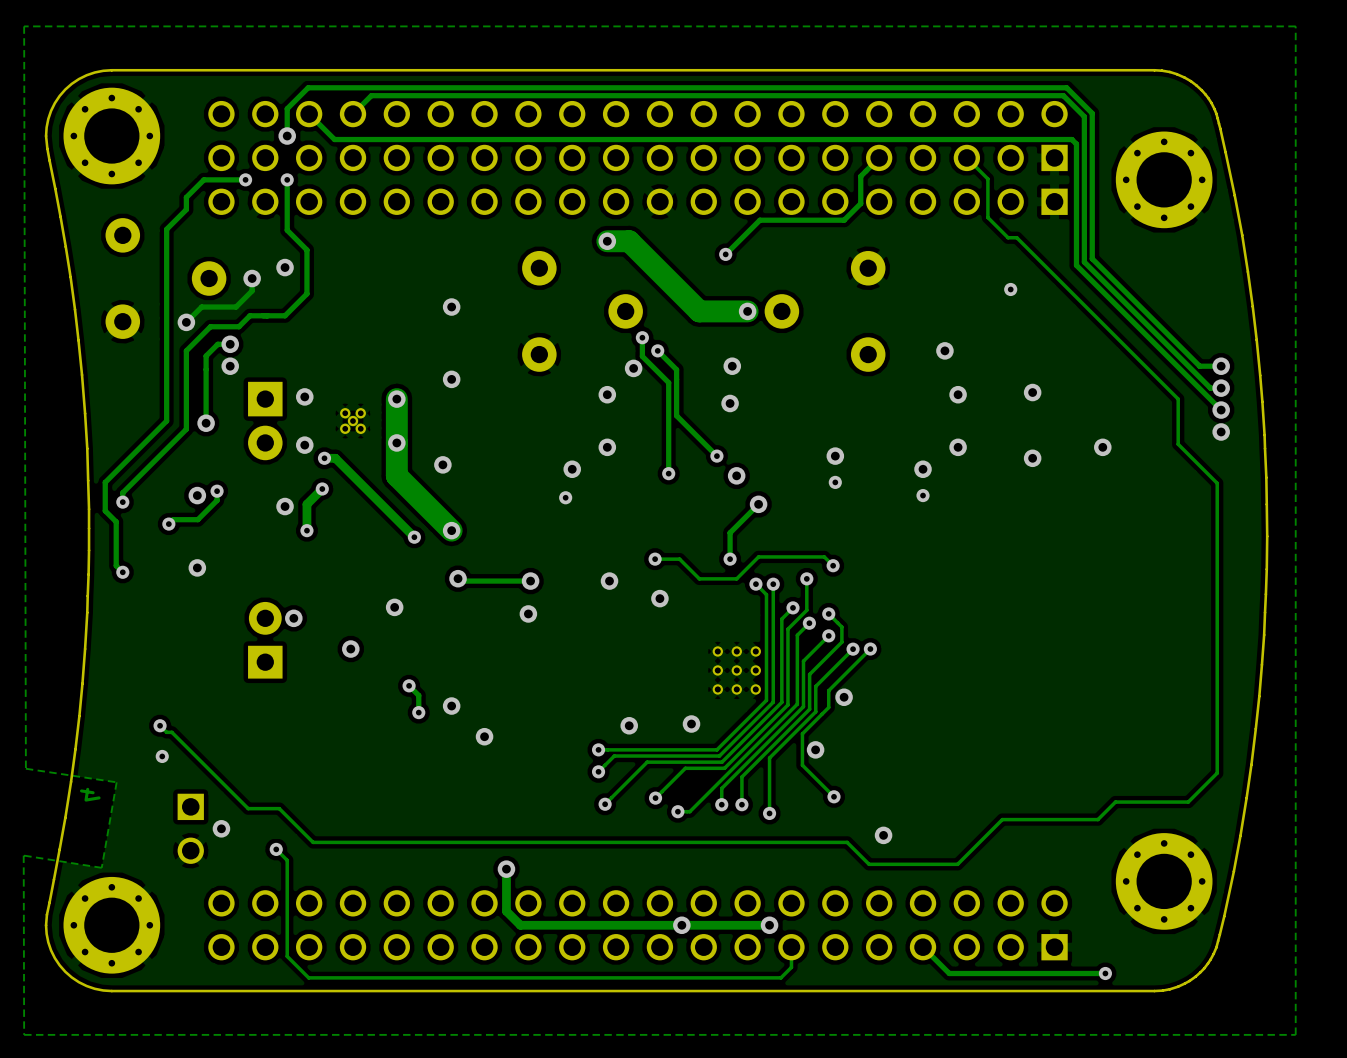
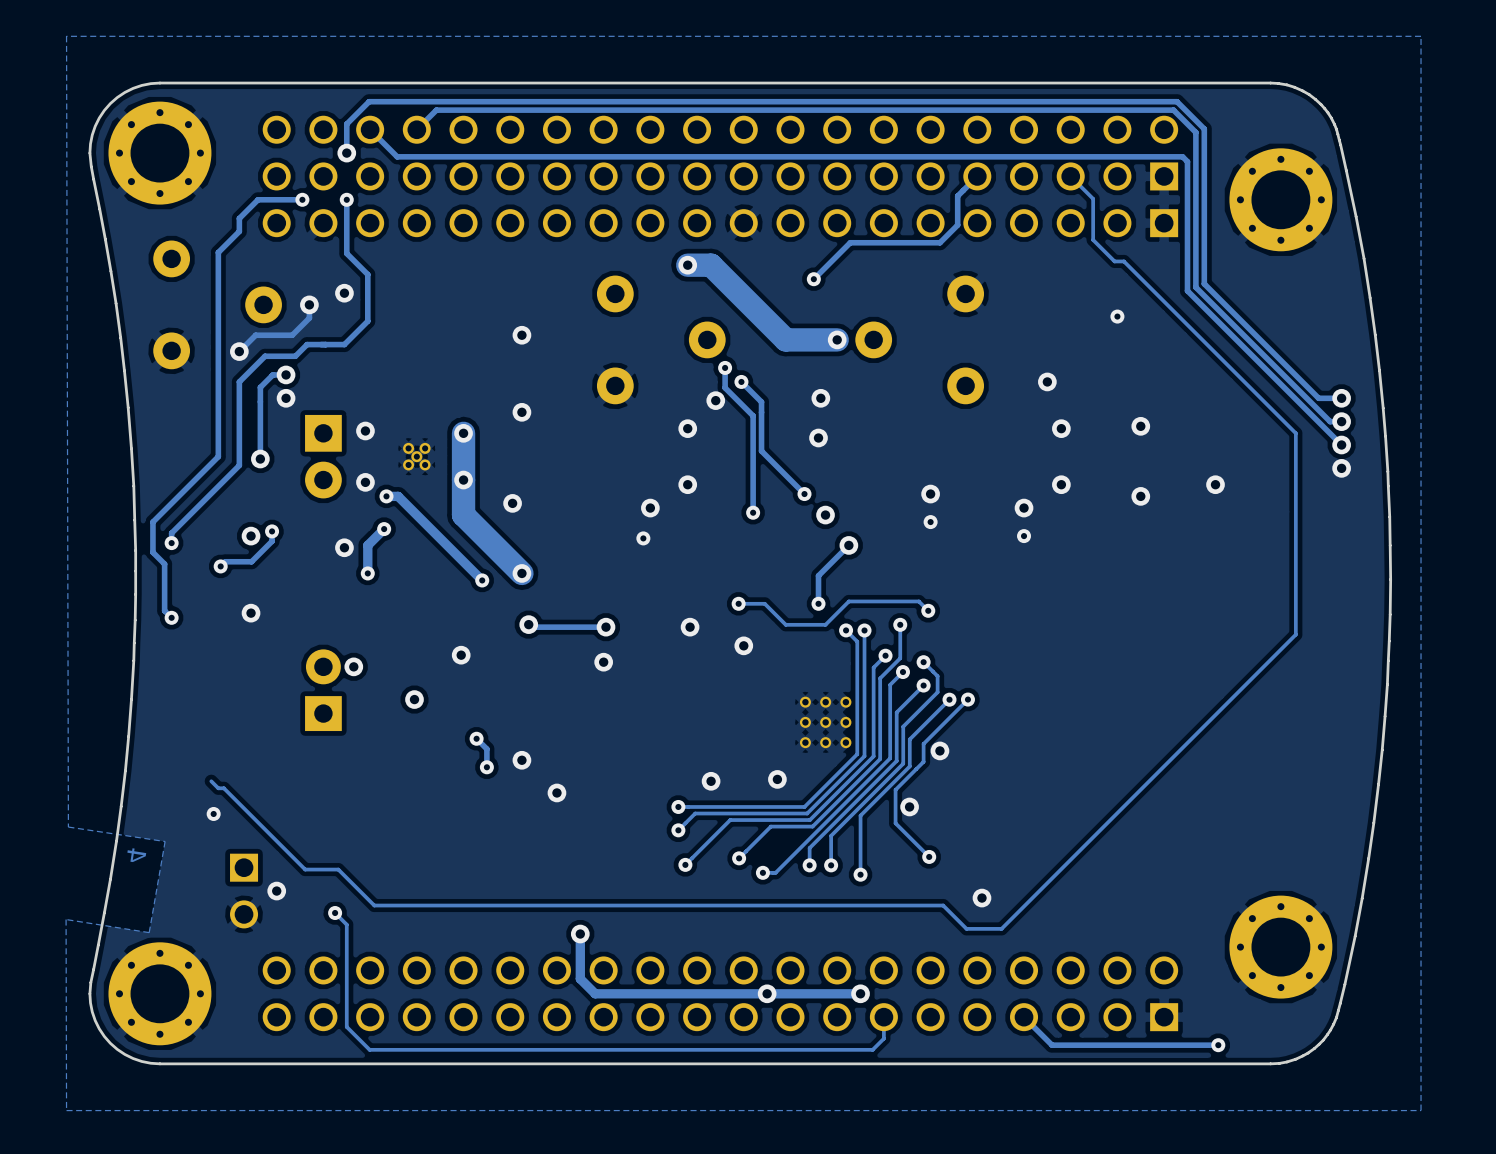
track: (1178, 444) (1217, 483) (1217, 773) (1188, 802) (1115, 802) (1097, 819) (1002, 819) (957, 864) (901, 864) -> (1295, 481) (1295, 634) (1001, 928)
via: (160, 725) -> none

